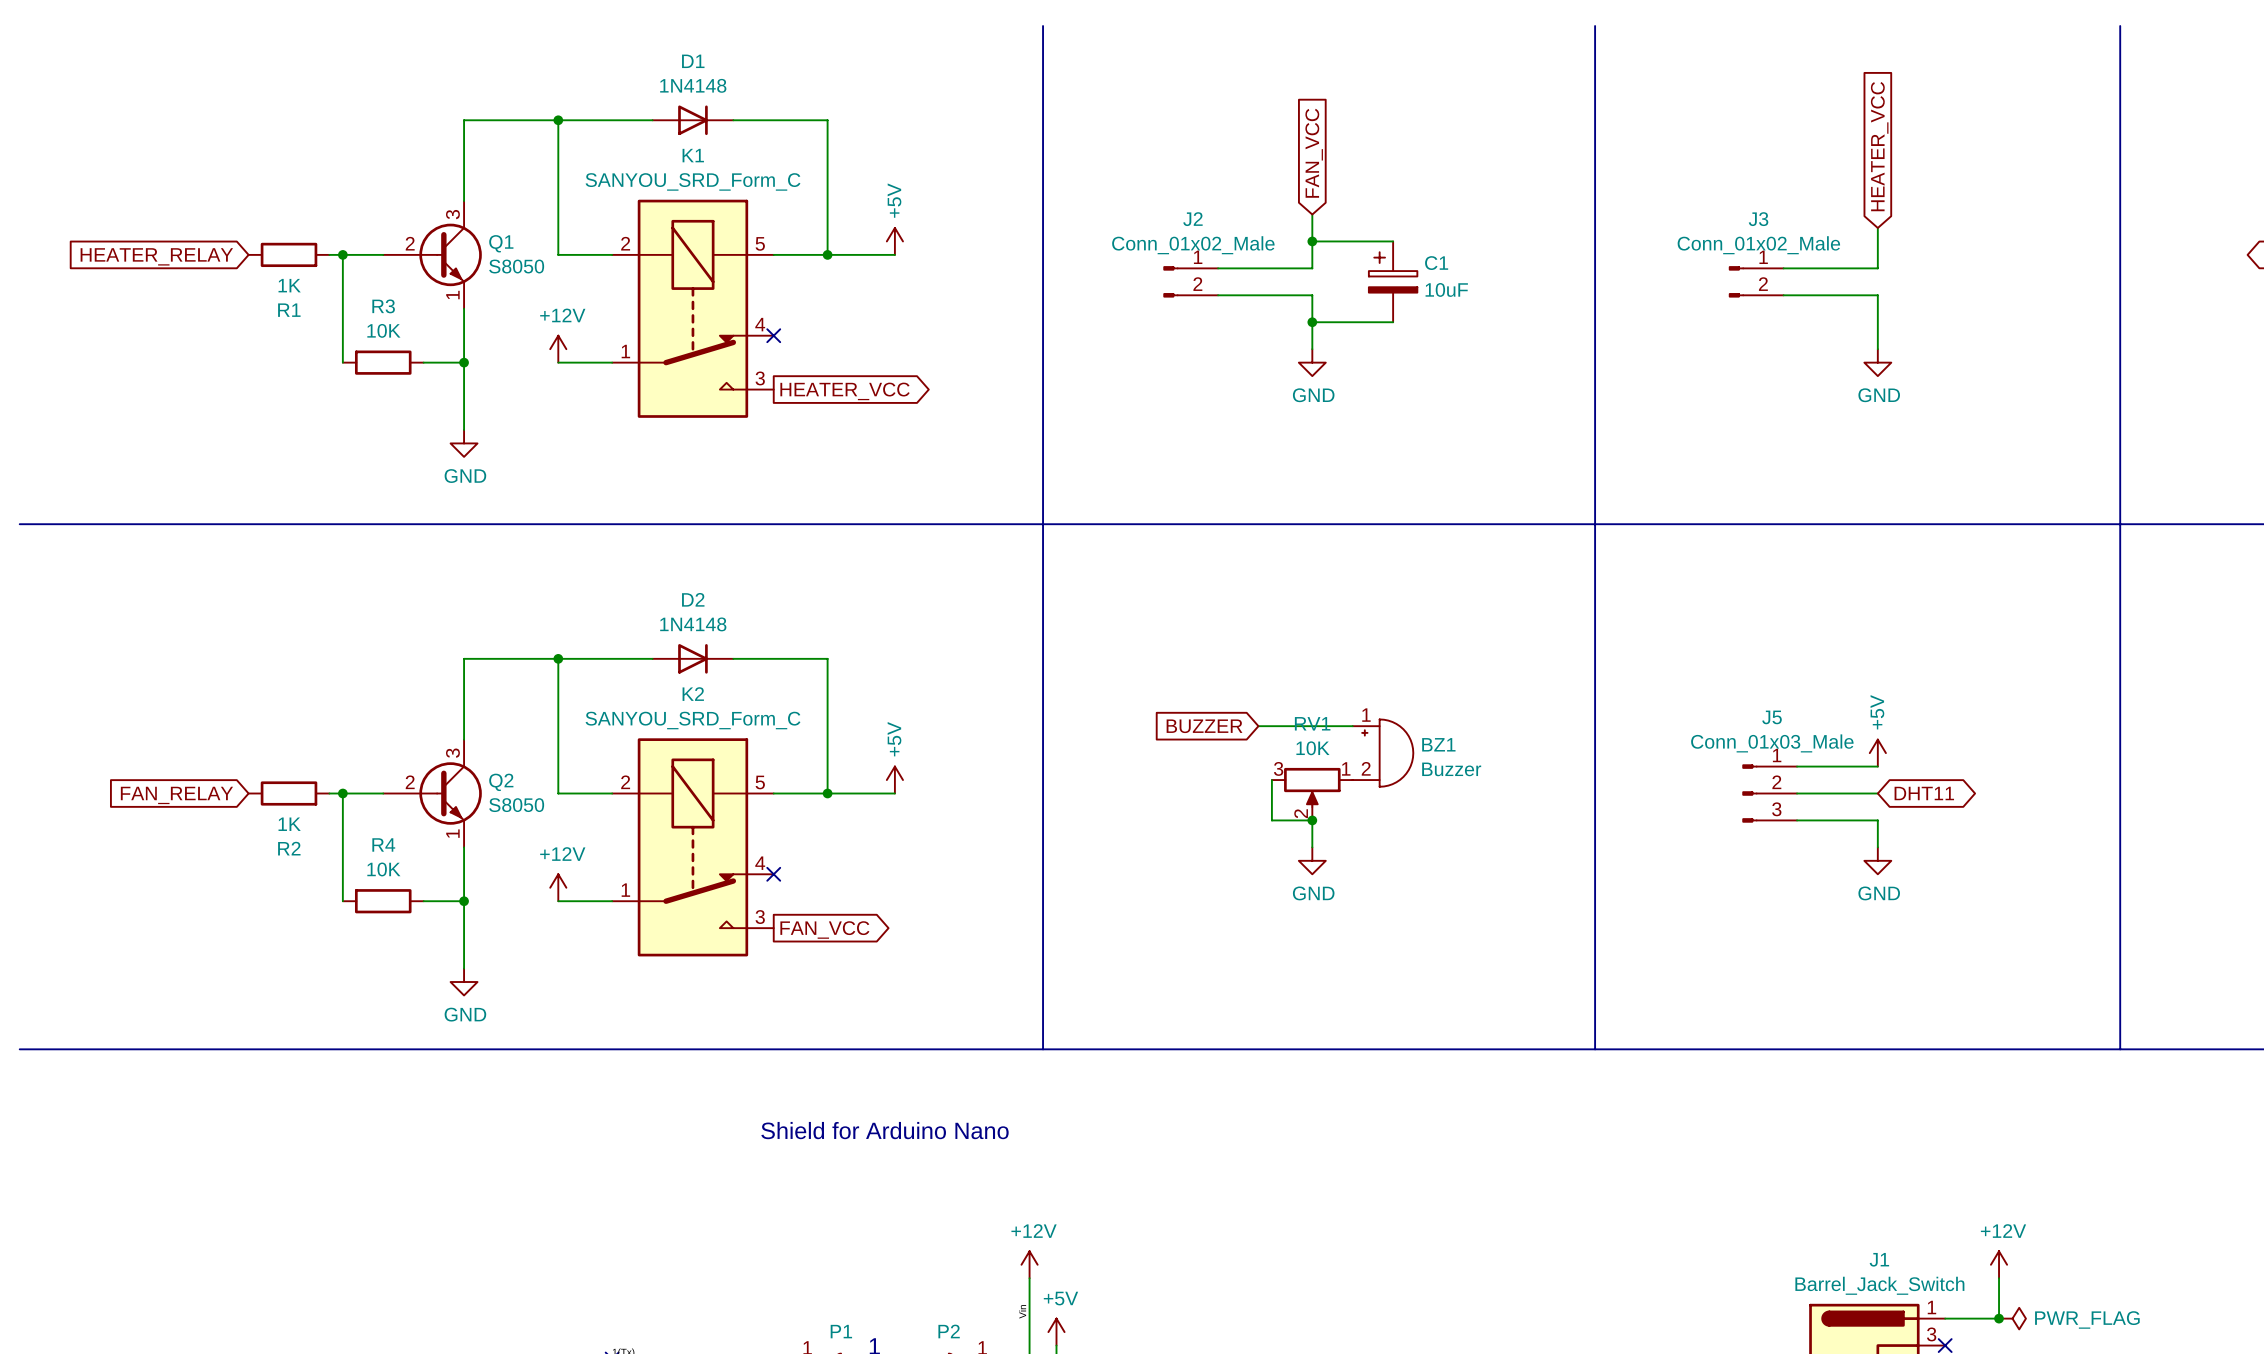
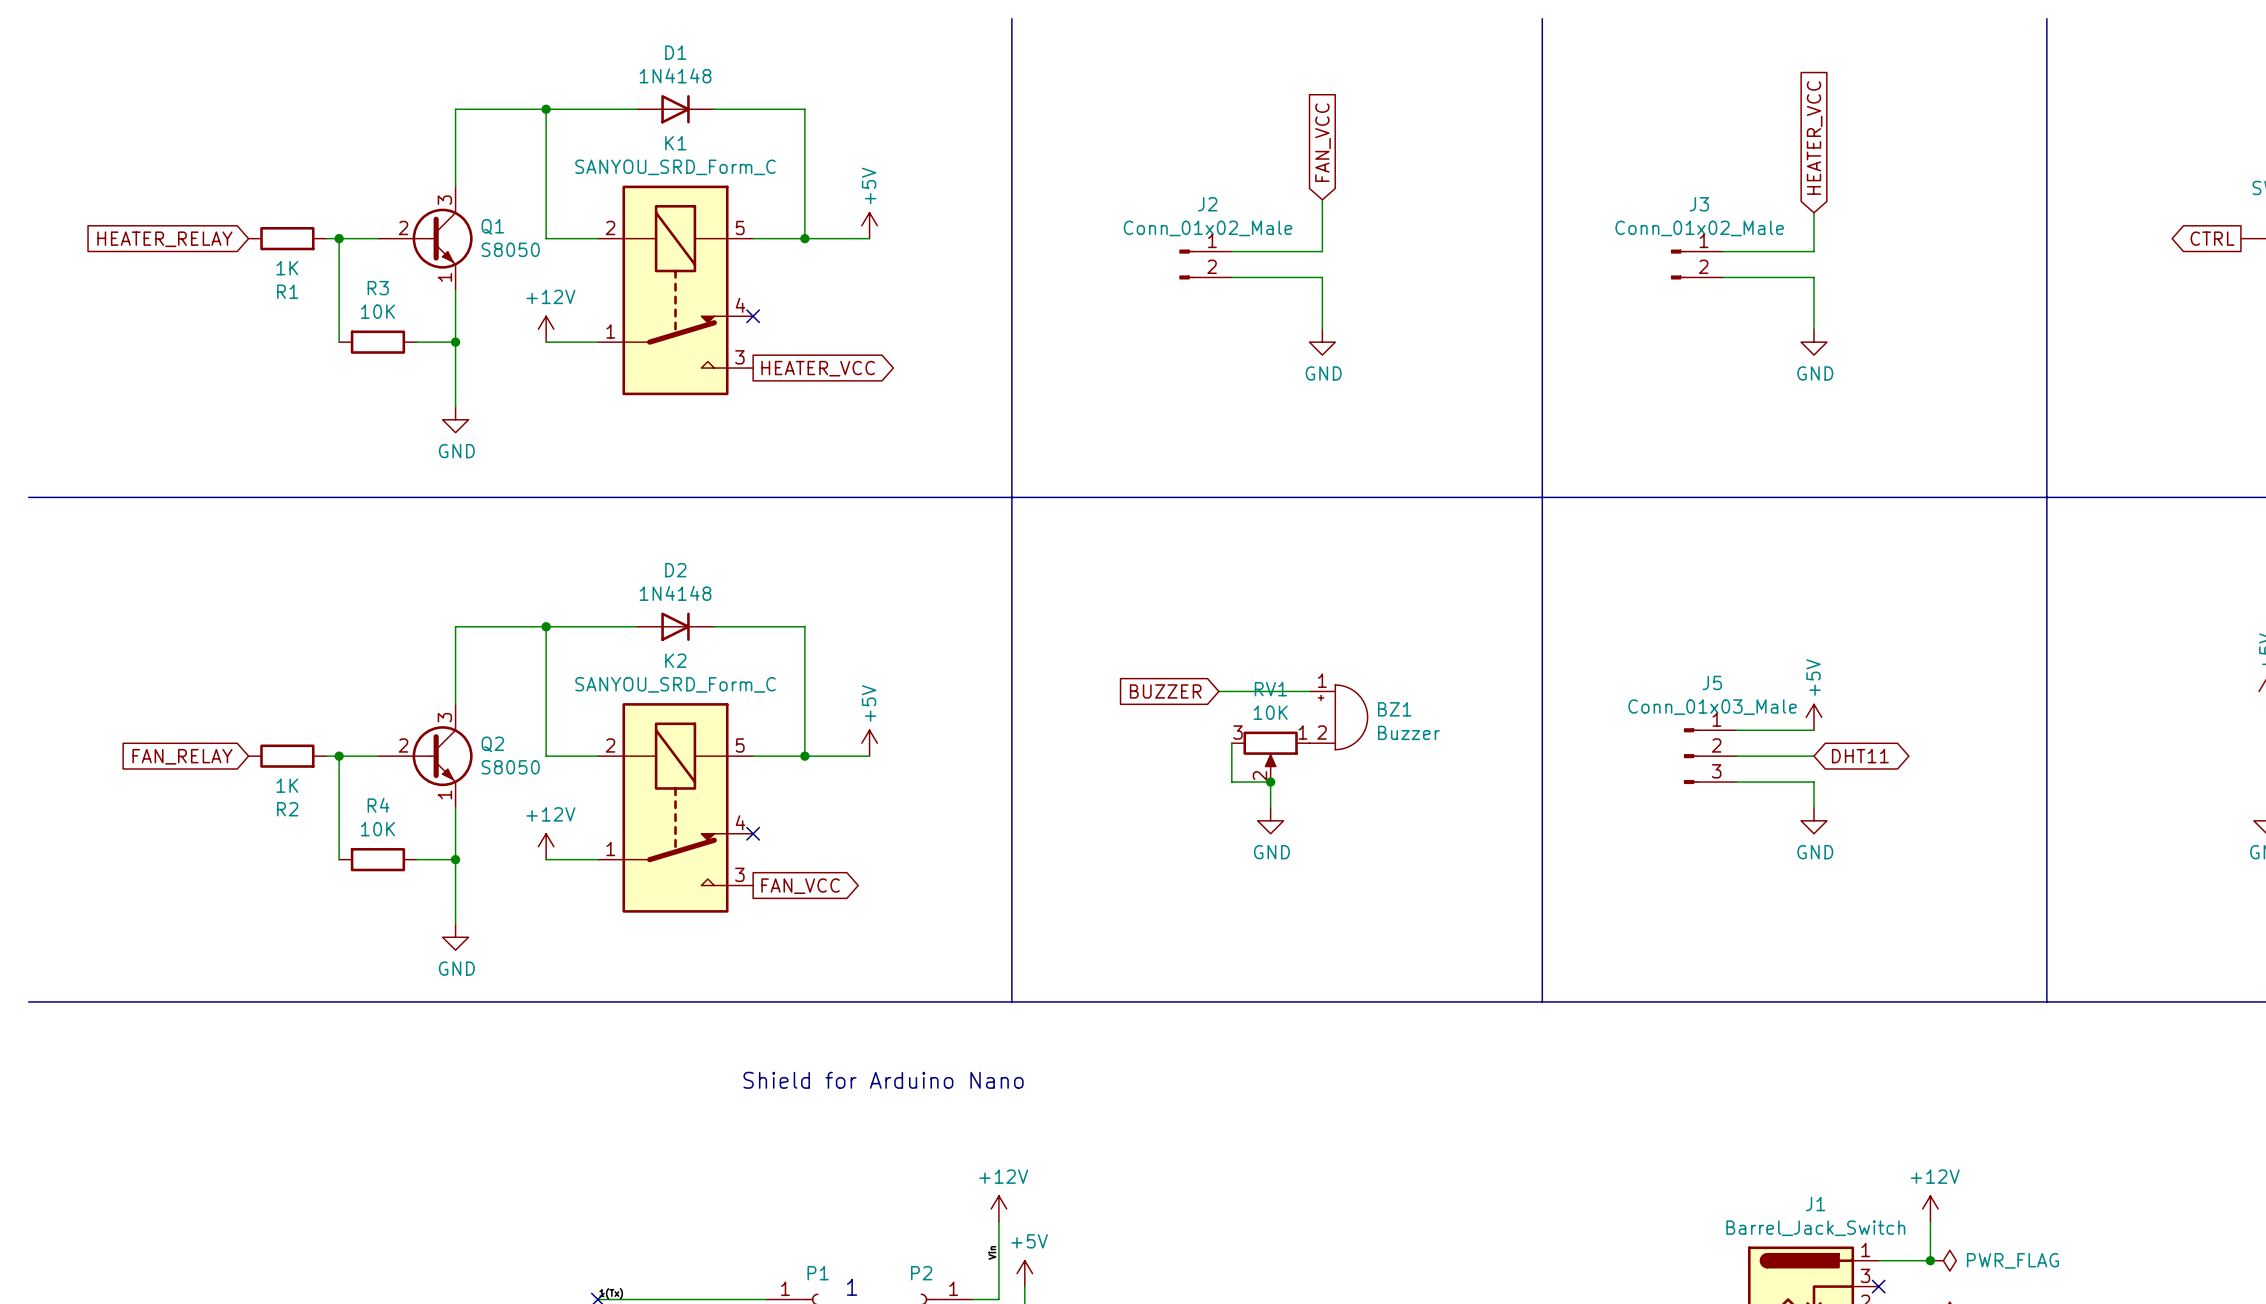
global label position: FAN_VCC (1314, 153) -> FAN_VCC (1322, 142)
wire: (1312, 214) (1312, 268) -> (1322, 199) (1322, 251) (1270, 251)
wire: (1312, 241) (1393, 241) -> none
junction: (1312, 241) -> none
J2 position: (1190, 281) -> (1205, 264)
C1: 10uF (1393, 281) -> none
wire: (1312, 295) (1312, 349) -> (1270, 277) (1322, 277) (1322, 329)
wire: (1312, 322) (1393, 322) -> none
junction: (1312, 322) -> none
power symbol position: GND (1312, 362) -> GND (1322, 342)

